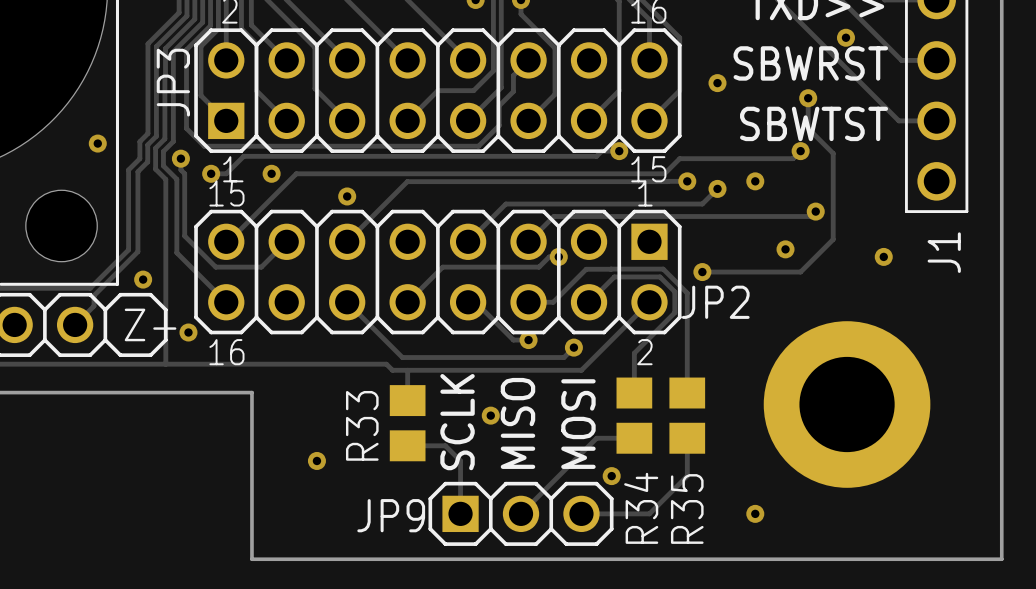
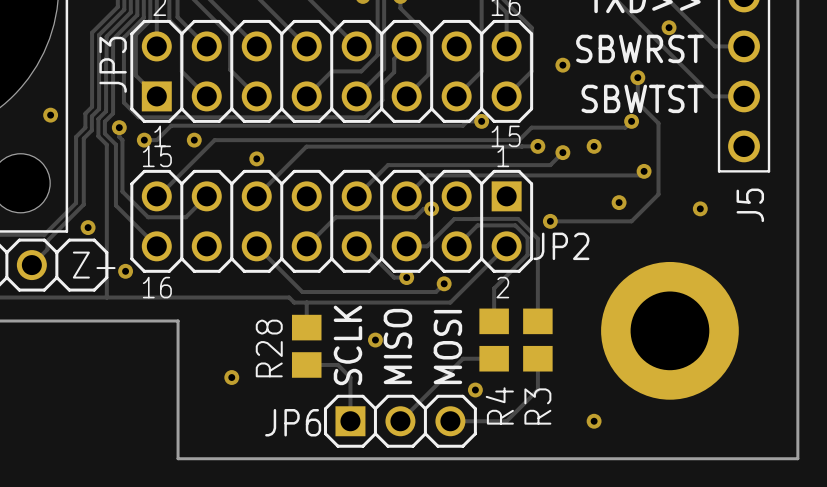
J1 name: J1 (944, 252) -> J5 (750, 205)
R33 name: R33 (362, 425) -> R28 (269, 348)
R34 name: R34 (641, 508) -> R4 (499, 405)
R35 name: R35 (687, 508) -> R3 (537, 406)
JP9 name: JP9 (391, 515) -> JP6 (293, 422)

